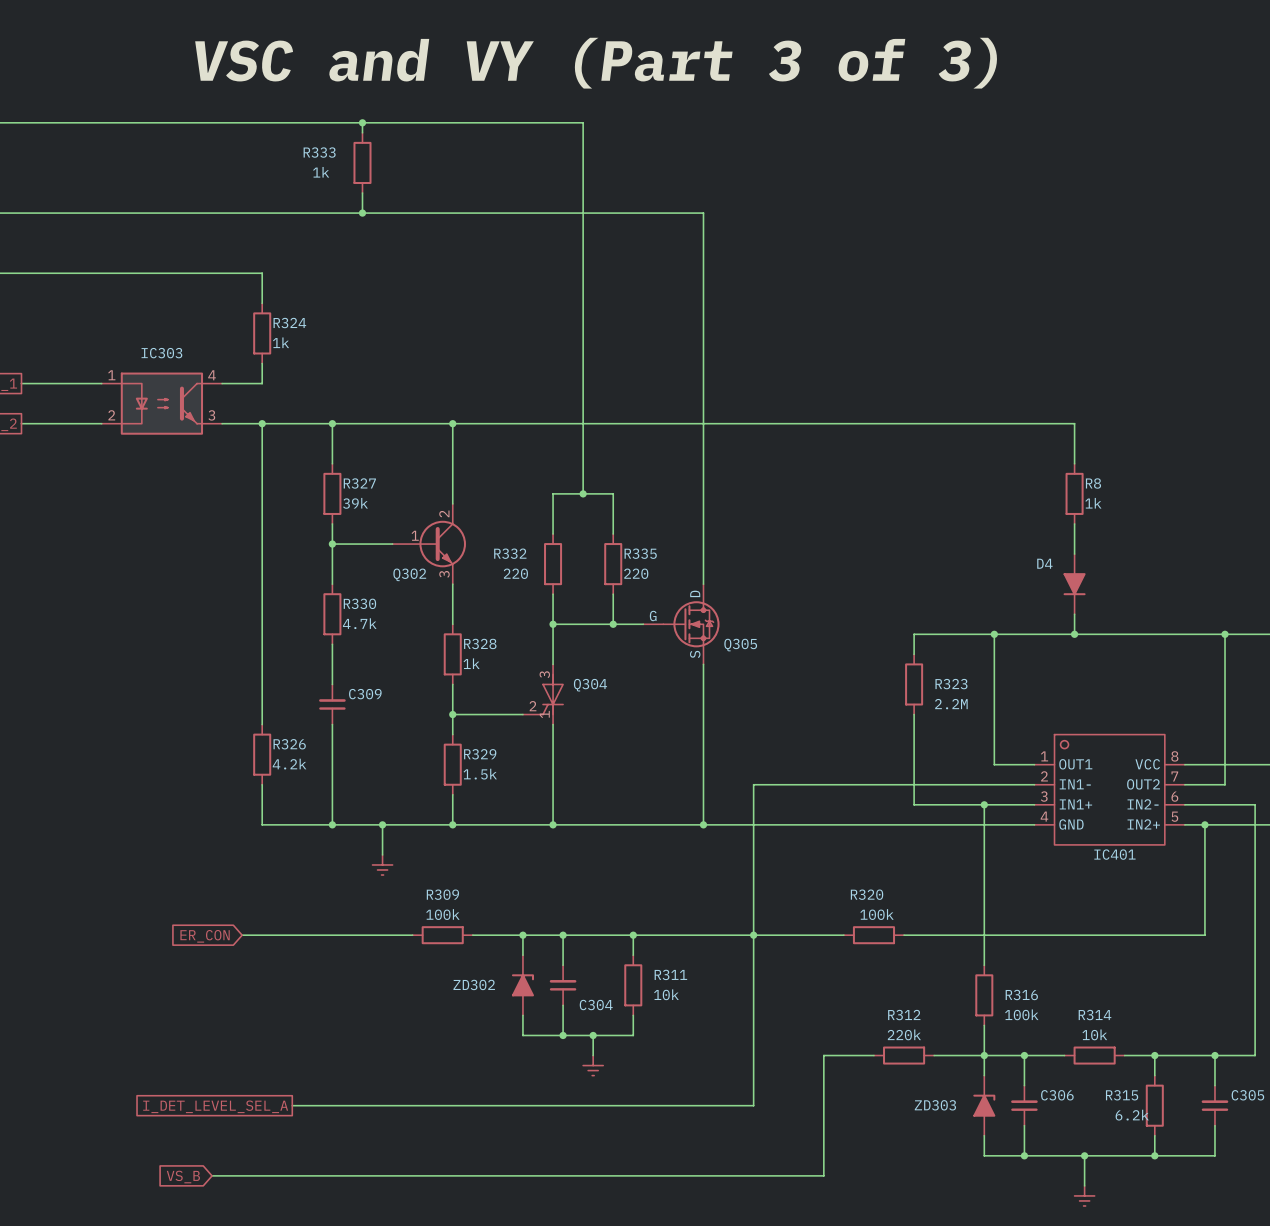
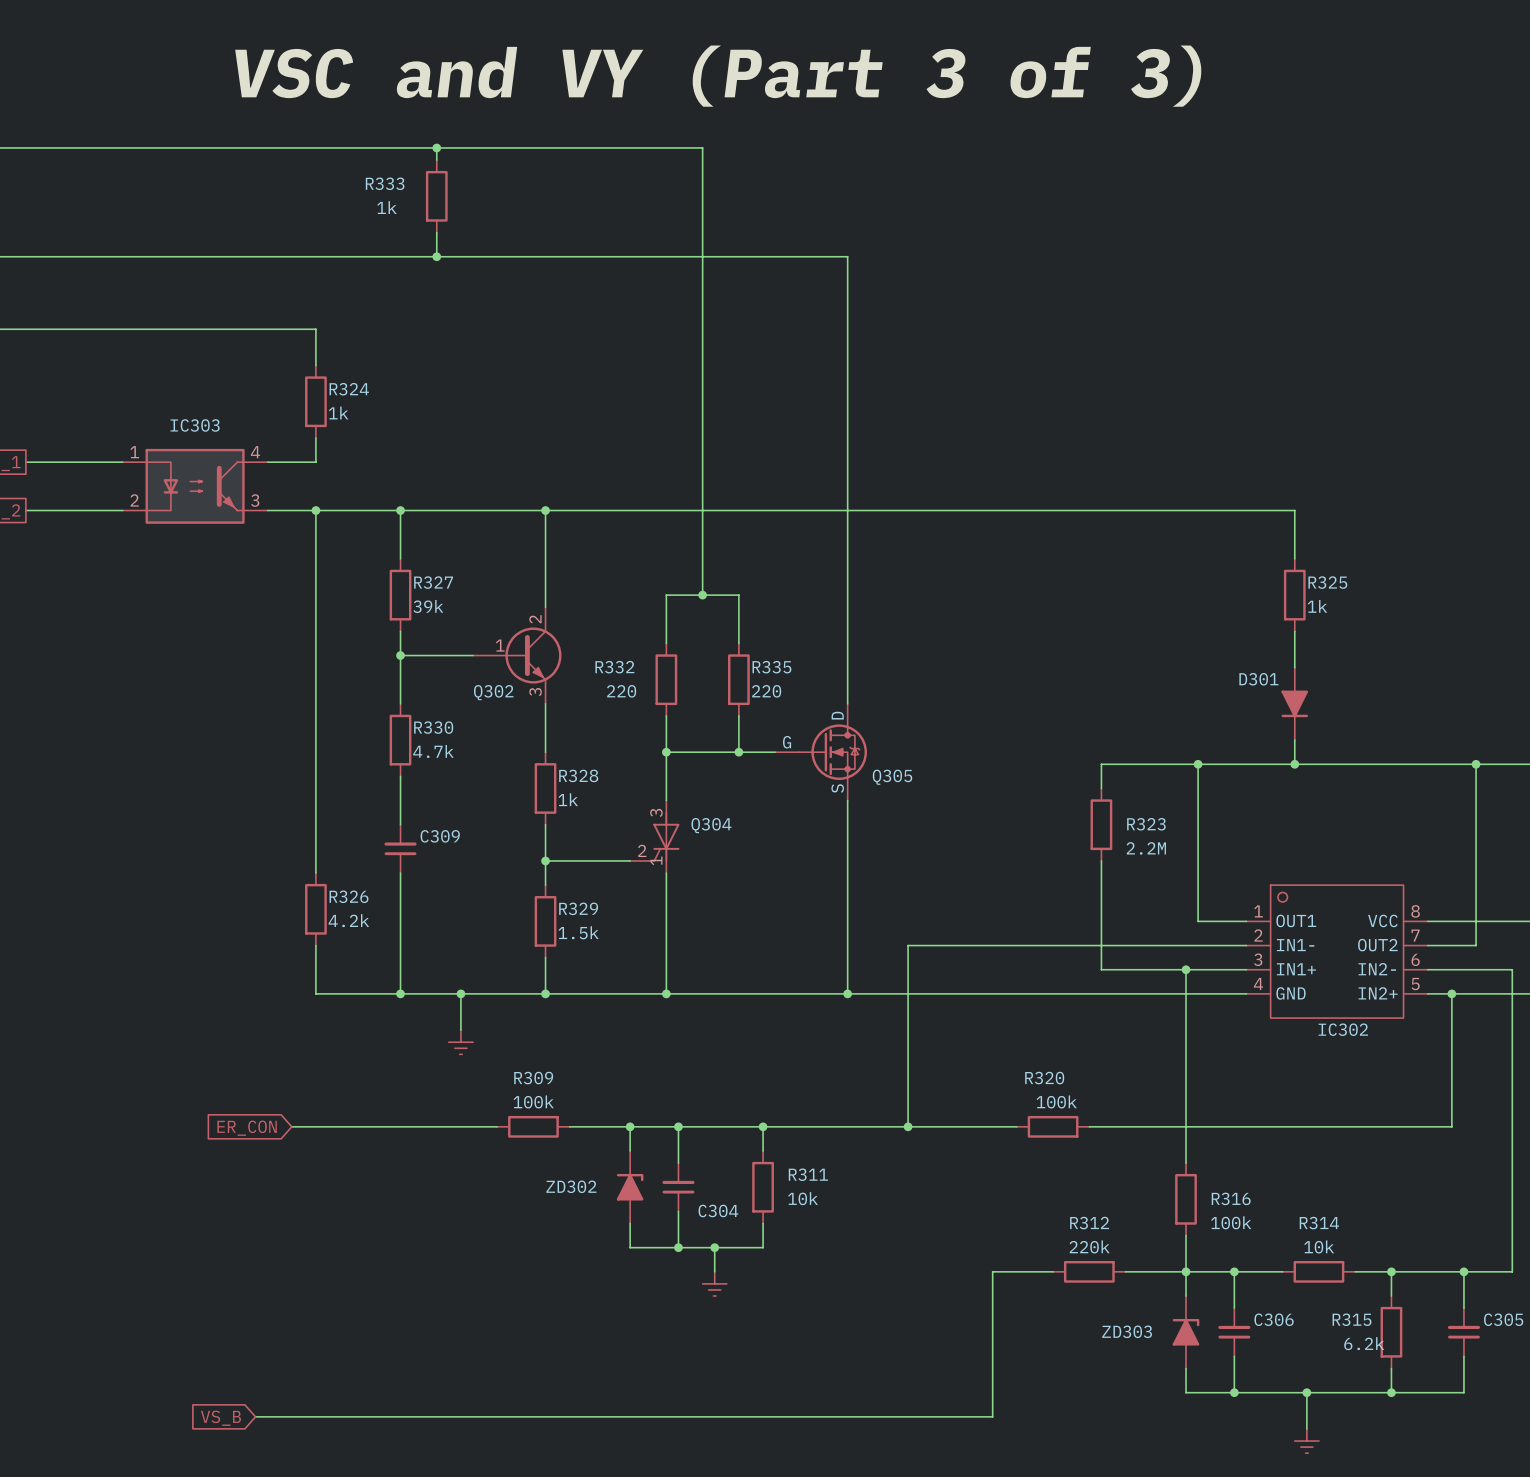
R8 name: R8 (1093, 483) -> R325 (1327, 582)
D4 name: D4 (1044, 563) -> D301 (1258, 679)
IC401 name: IC401 (1114, 854) -> IC302 (1343, 1029)
wire: (753, 935) (753, 1105) (292, 1105) -> none
global label: I_DET_LEVEL_SEL_A (215, 1106) -> none

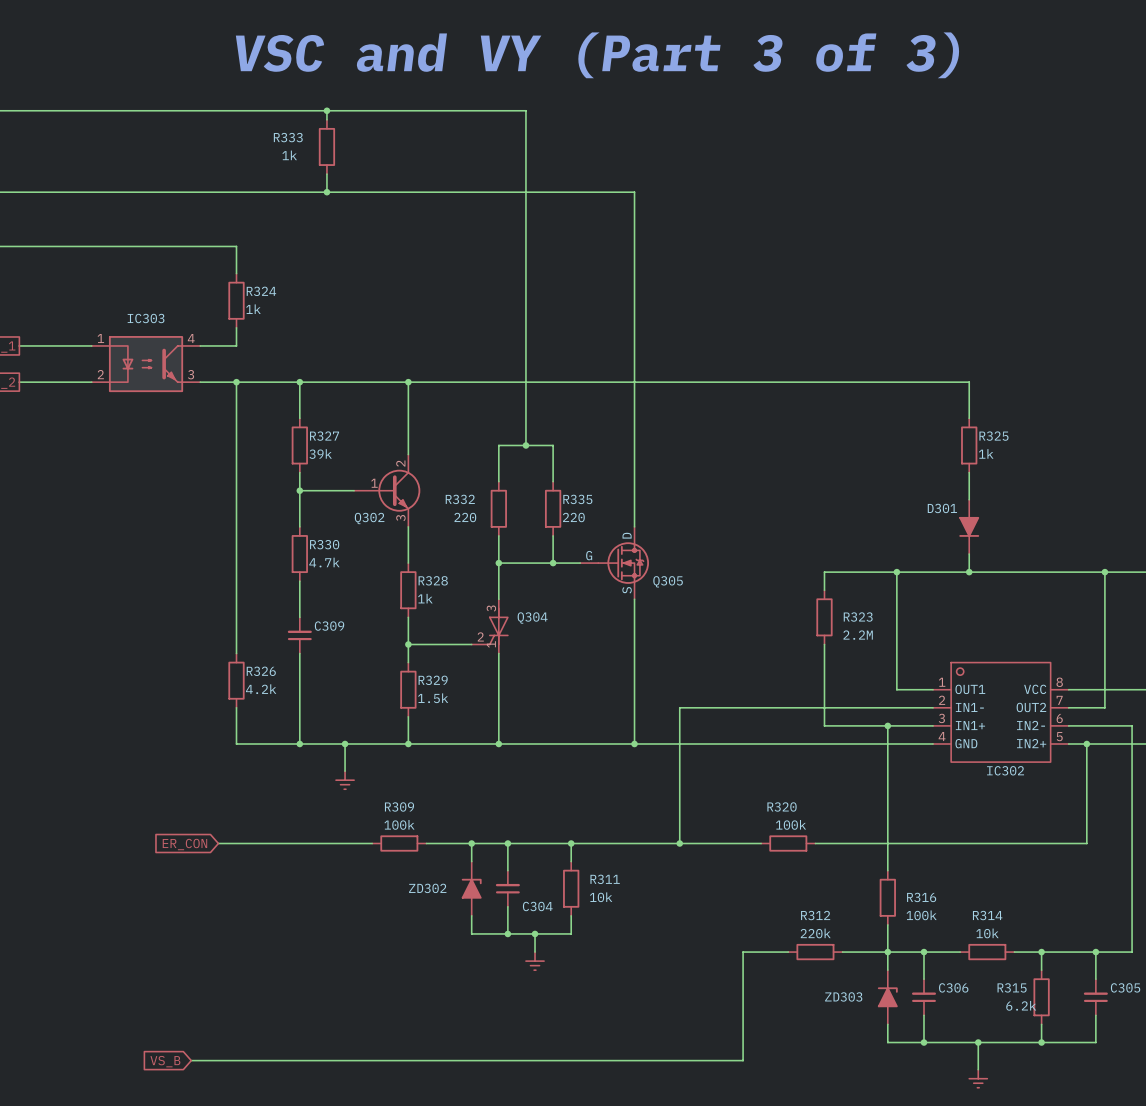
text: none -> VSC and VY (Part 3 of 3) (597, 55)
label: VSC and VY (Part 3 of 3) (718, 76) -> none

